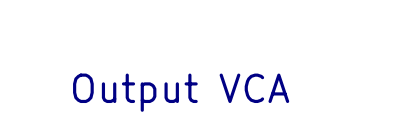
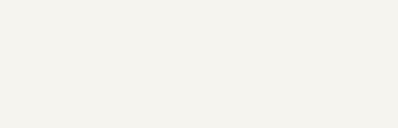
text: Output VCA (181, 92) -> none

